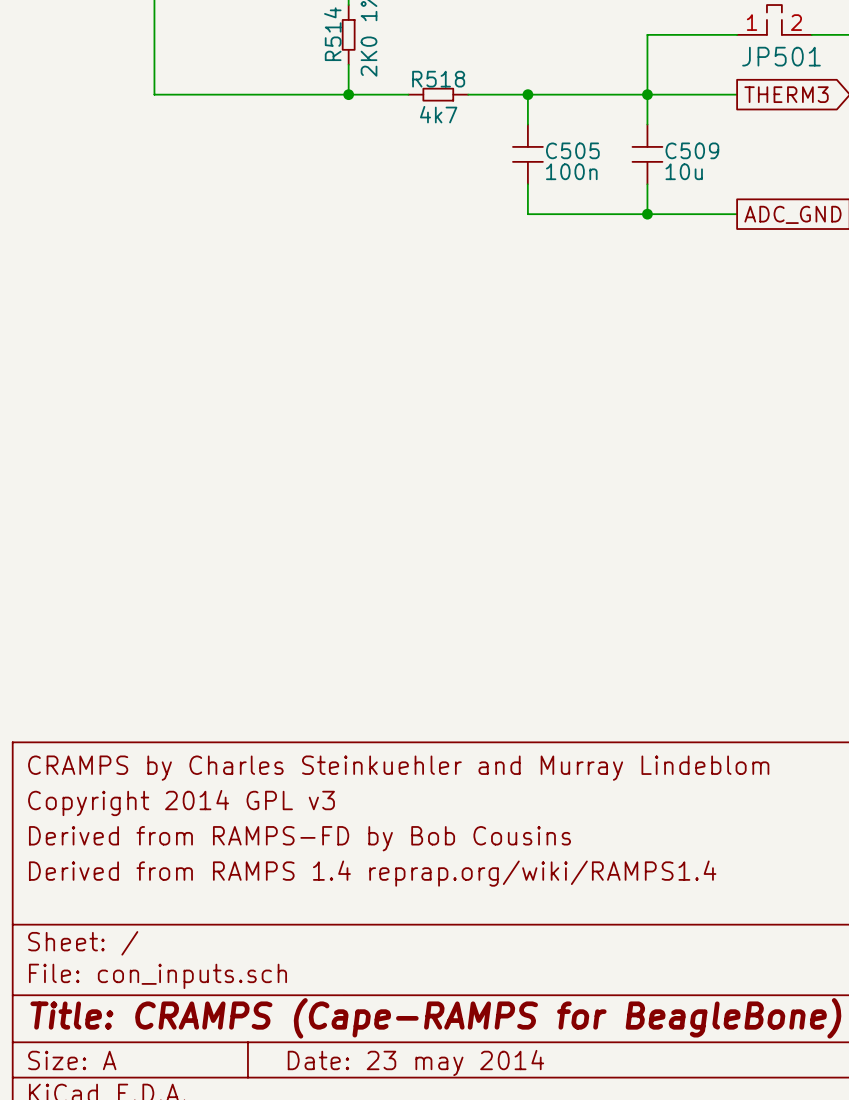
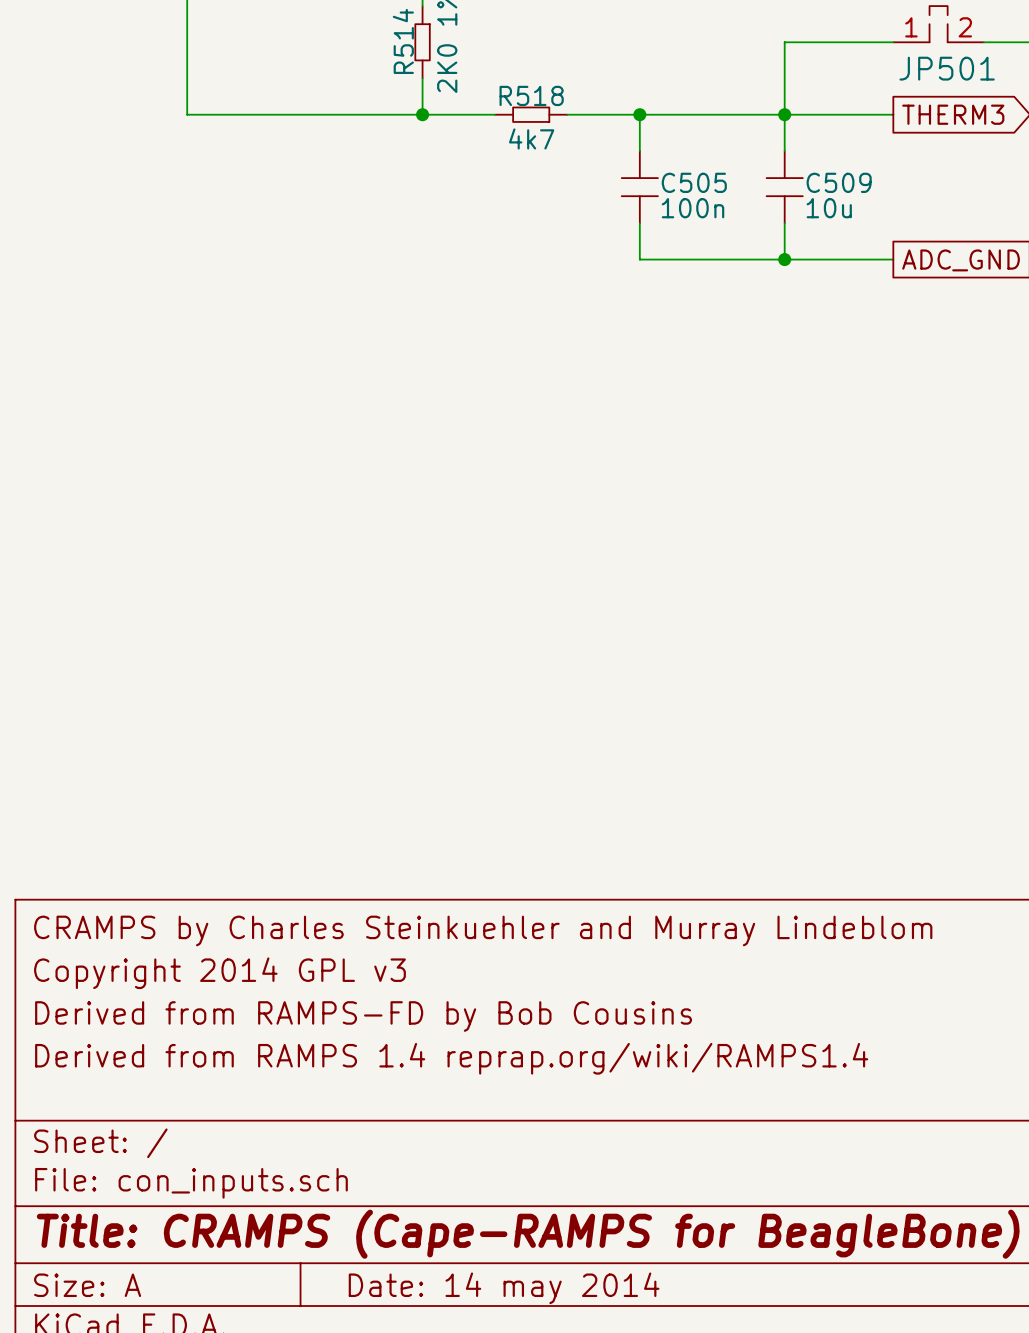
title block: Date: 23 may 2014 (415, 1062) -> Date: 14 may 2014 (504, 1288)

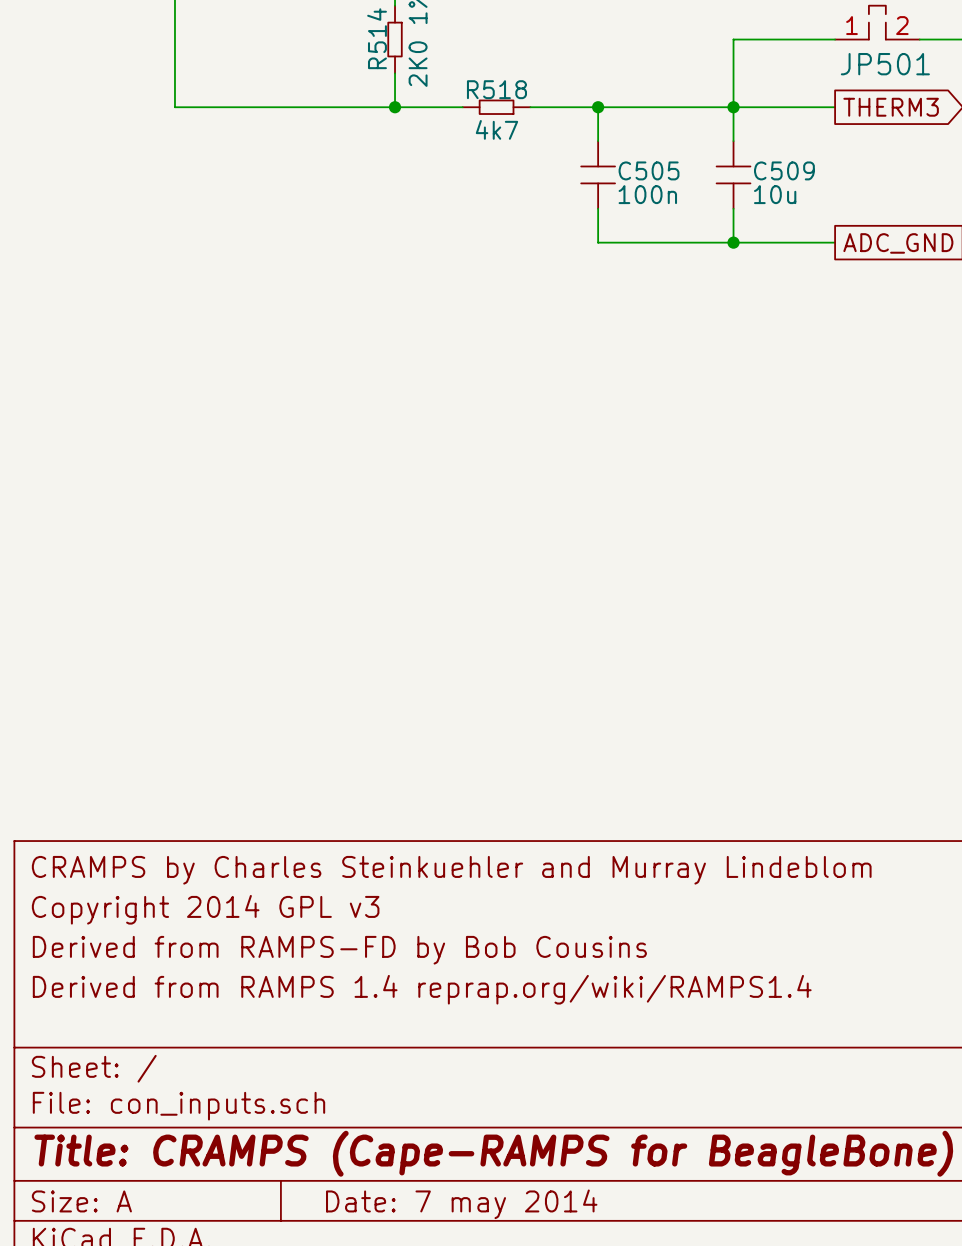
title block: Date: 14 may 2014 (504, 1288) -> Date: 7 may 2014 (461, 1204)

